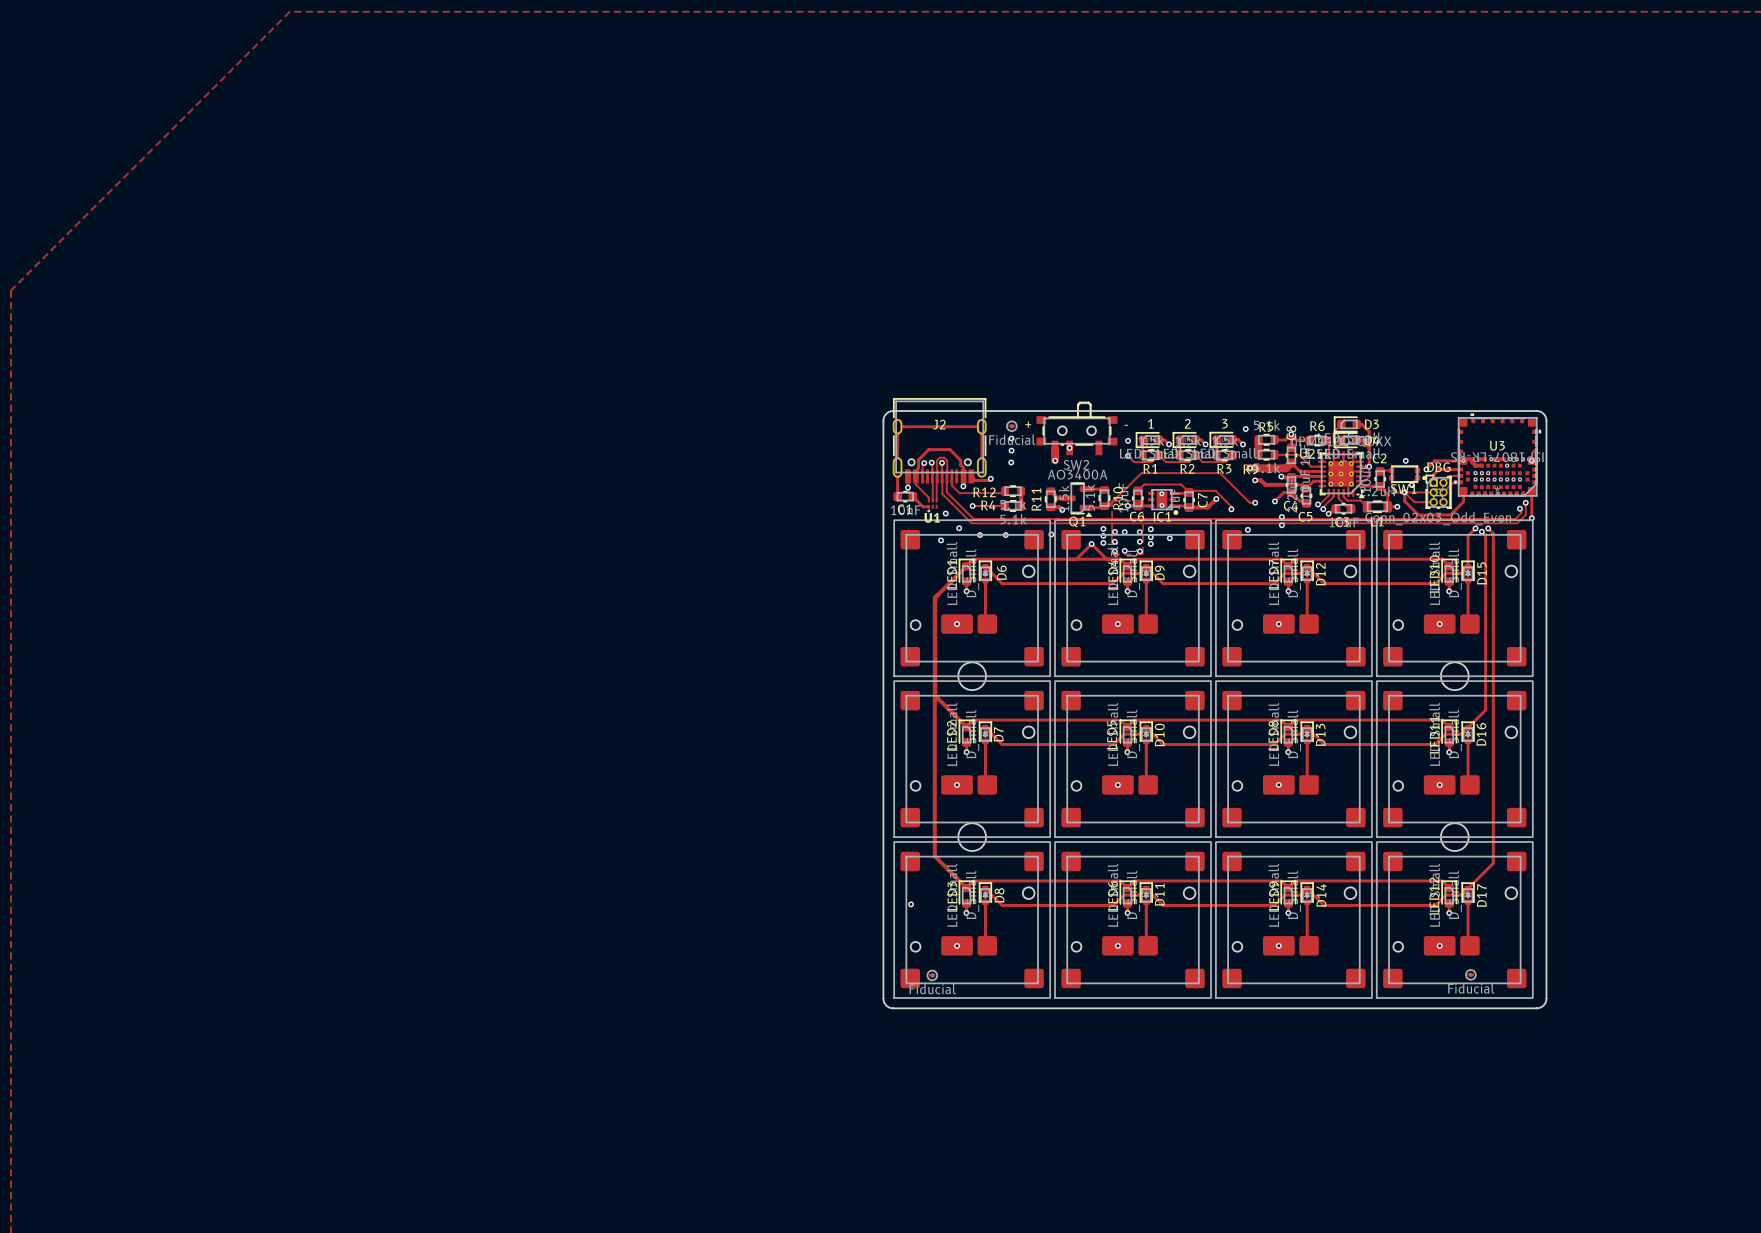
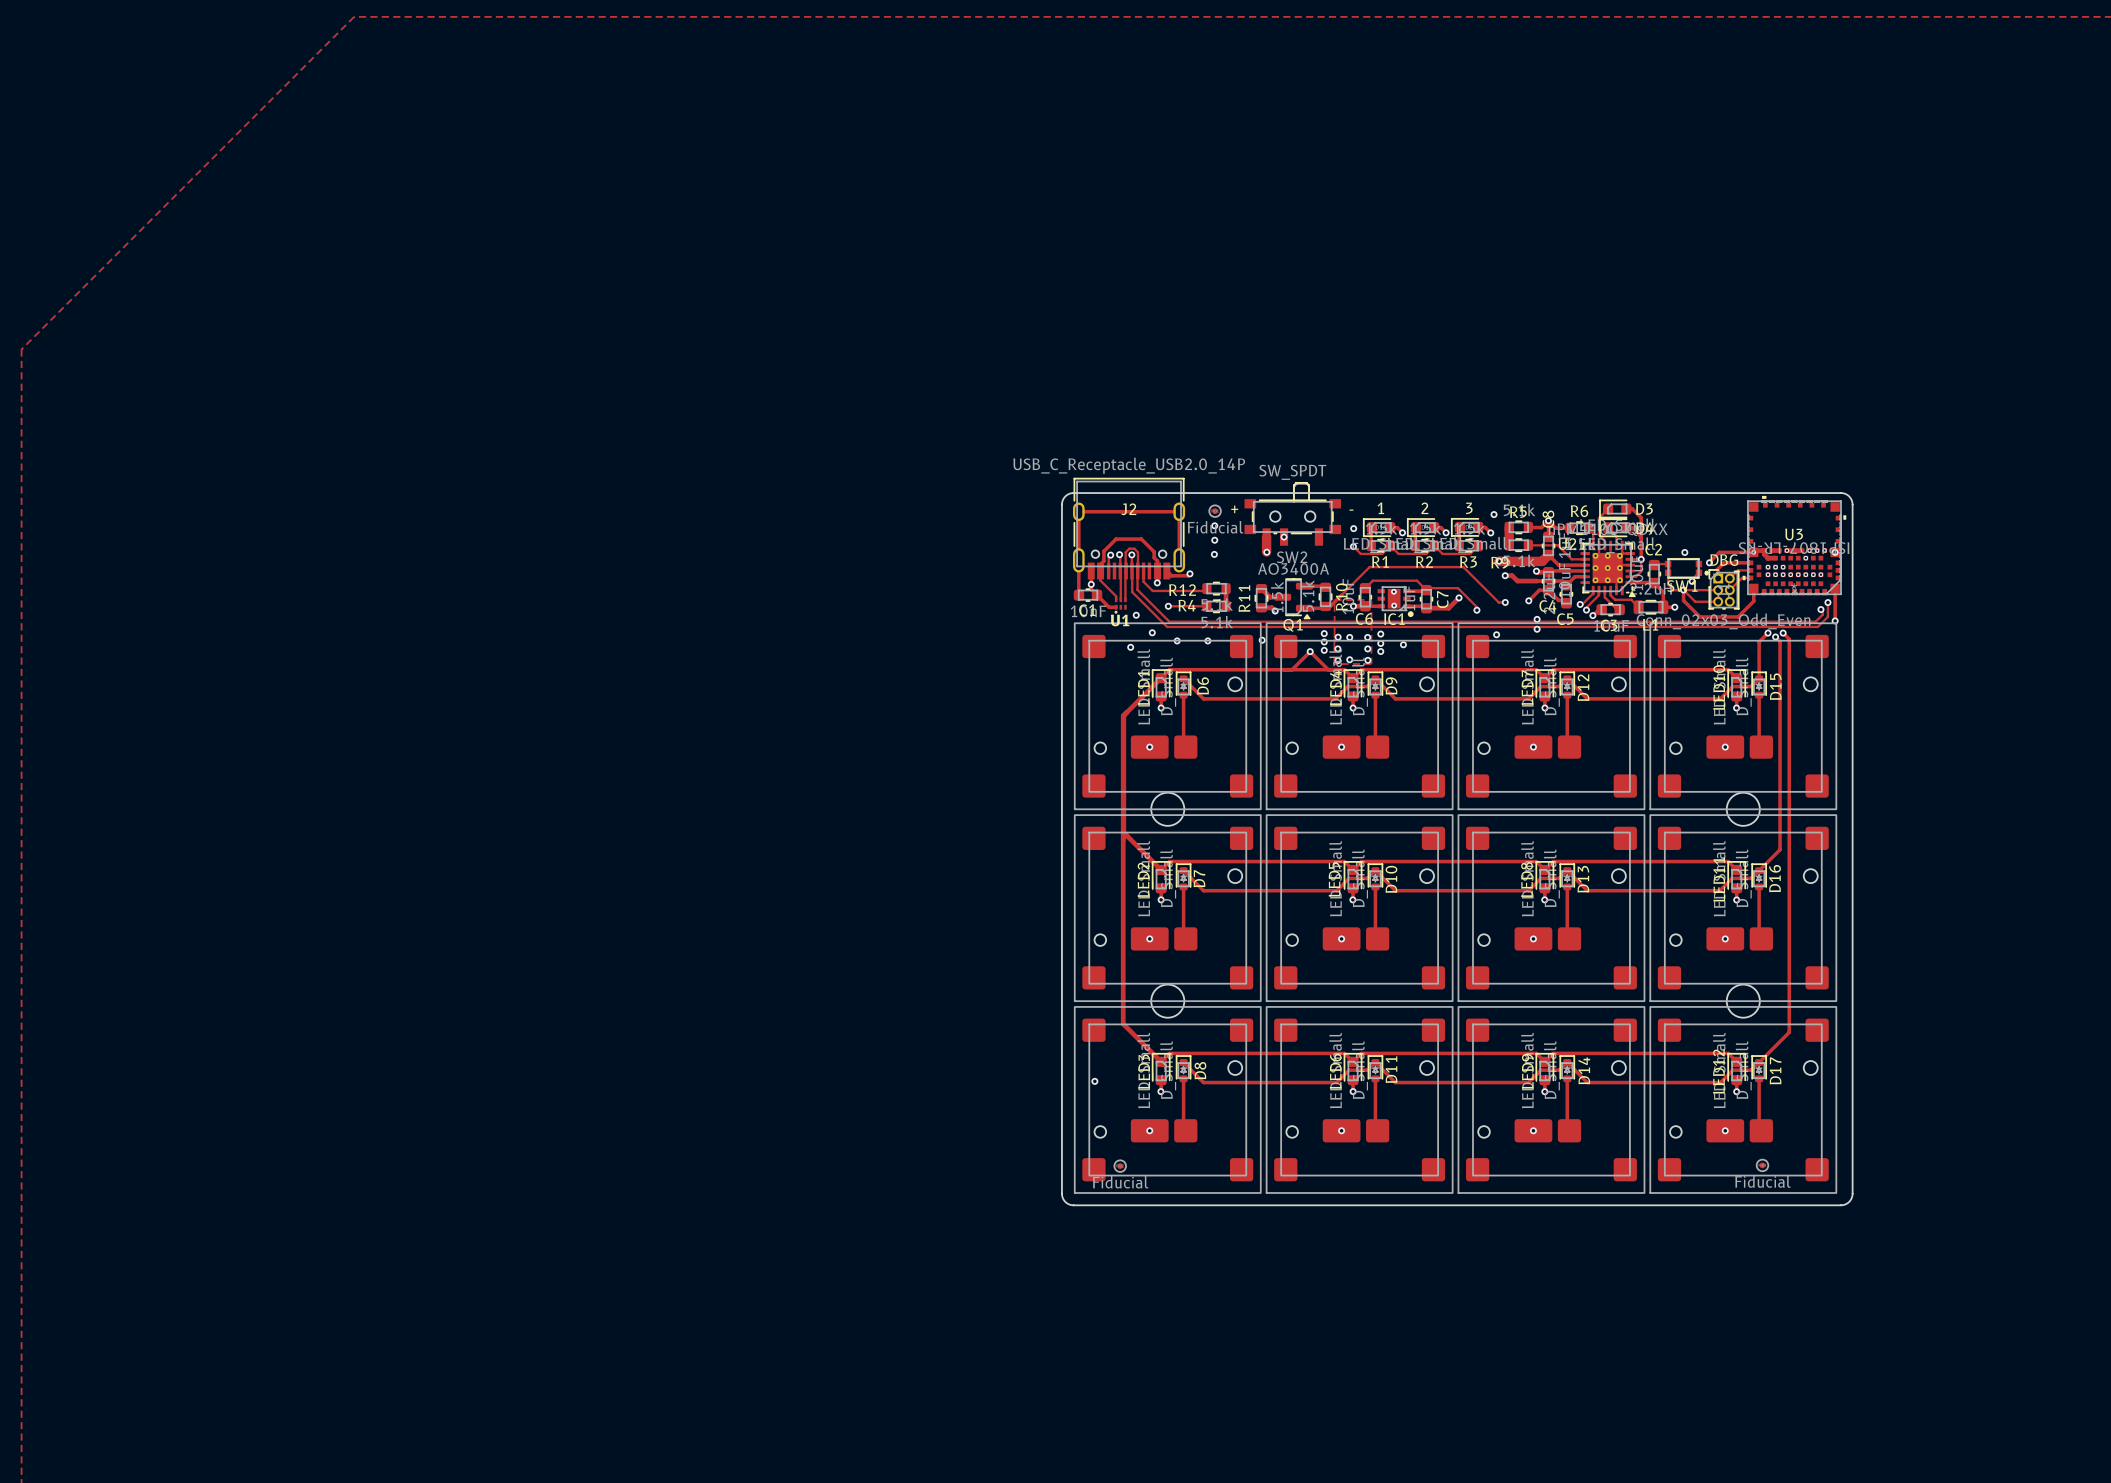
J2 value: none -> USB_C_Receptacle_USB2.0_14P (1129, 465)
SW2 value: none -> SW_SPDT (1292, 472)

